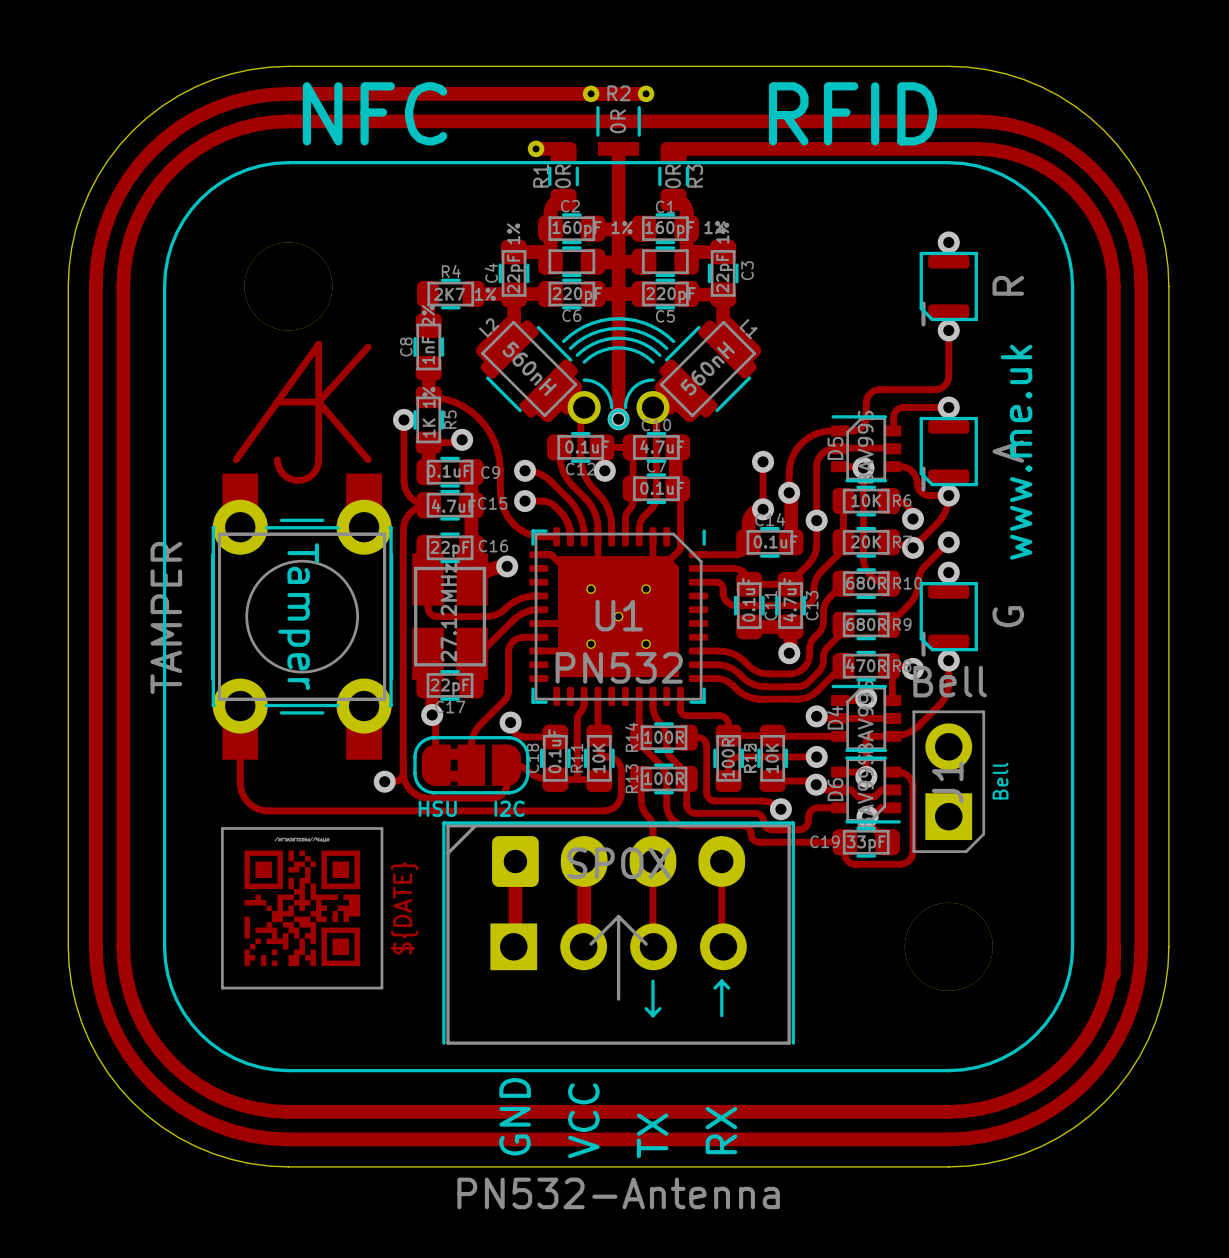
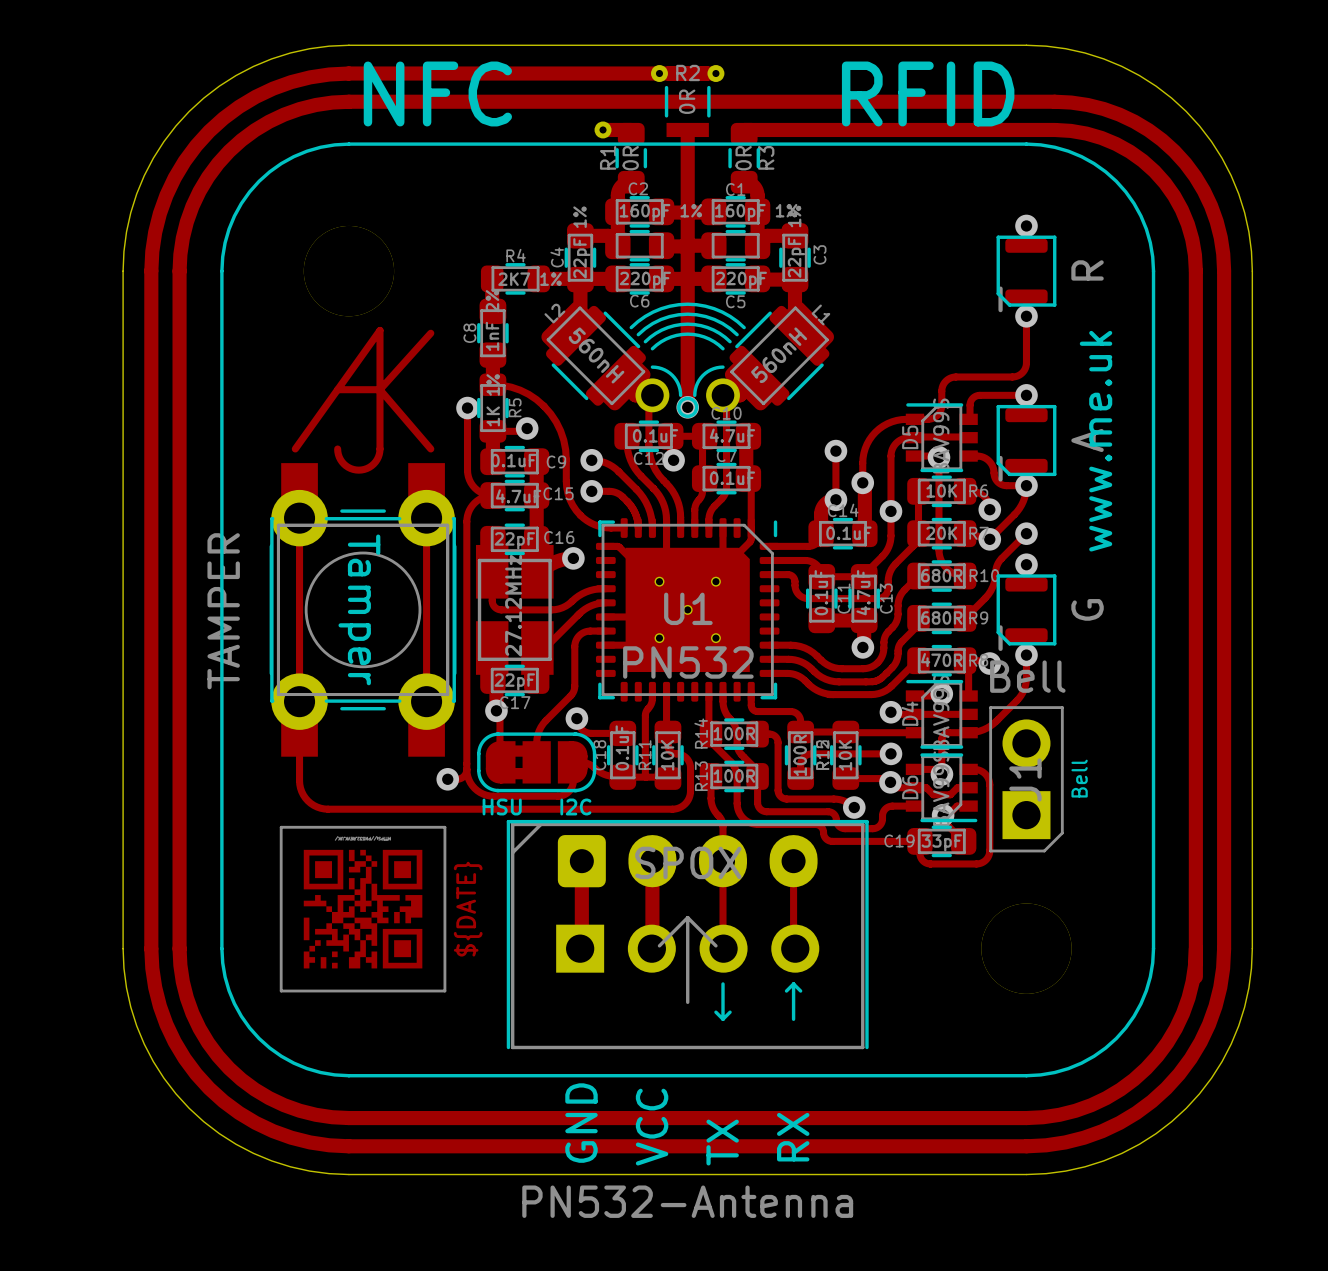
track: none -> (299, 518) (299, 701)
track: none -> (426, 518) (426, 701)

